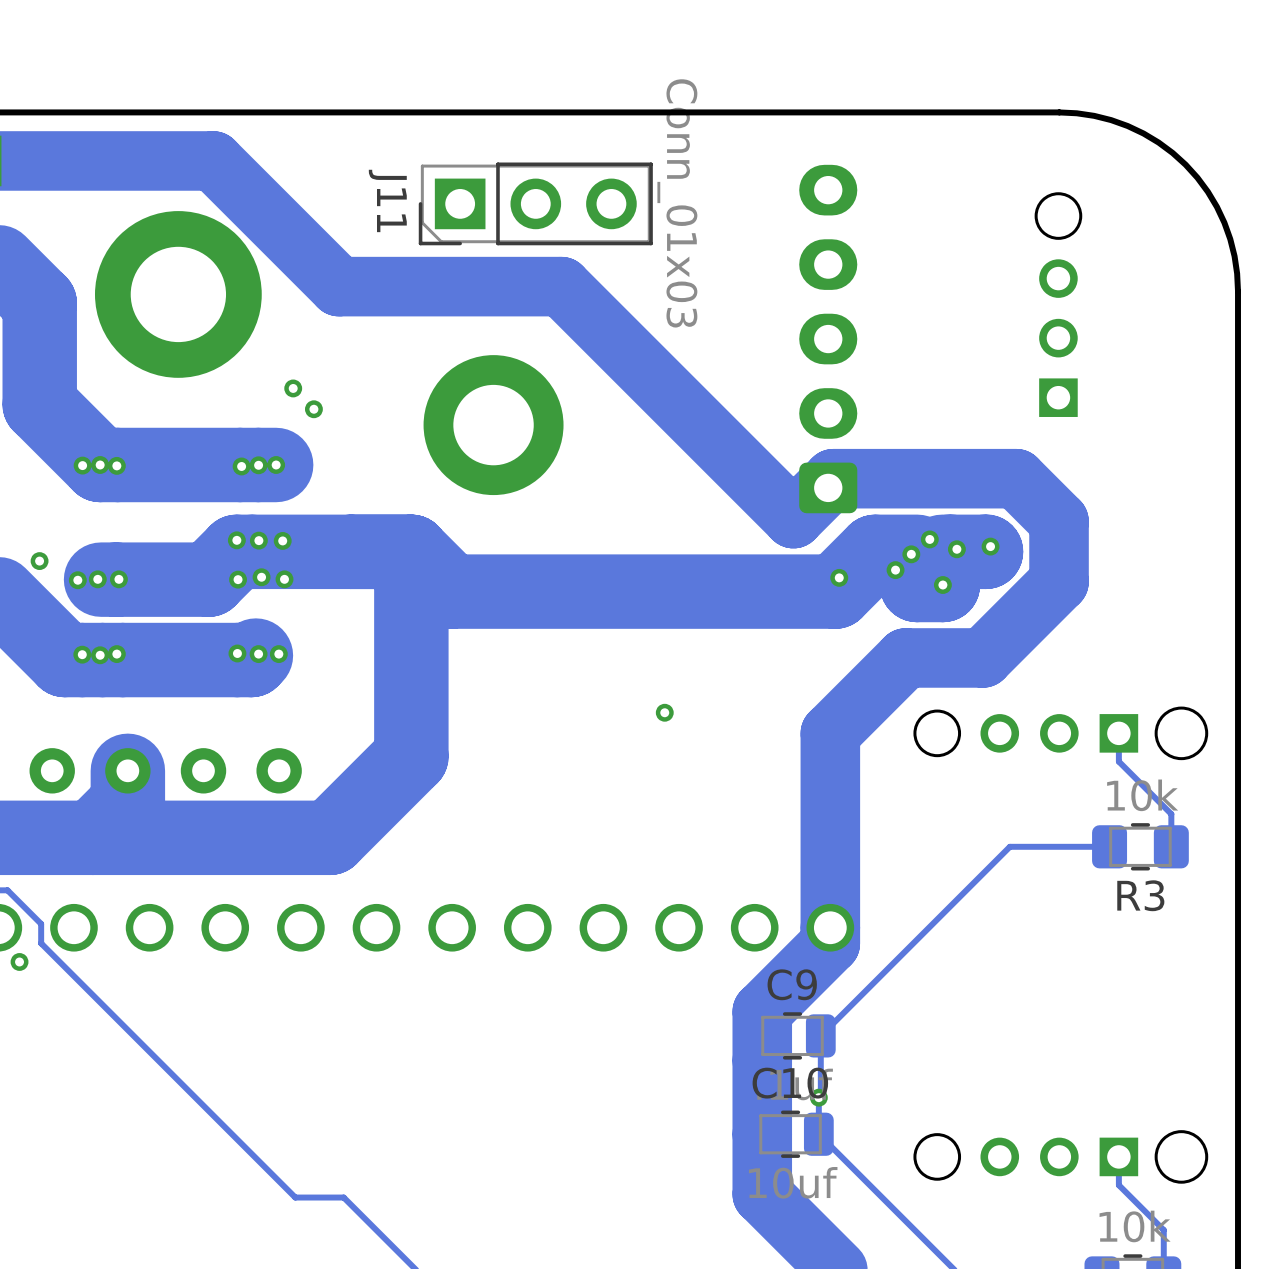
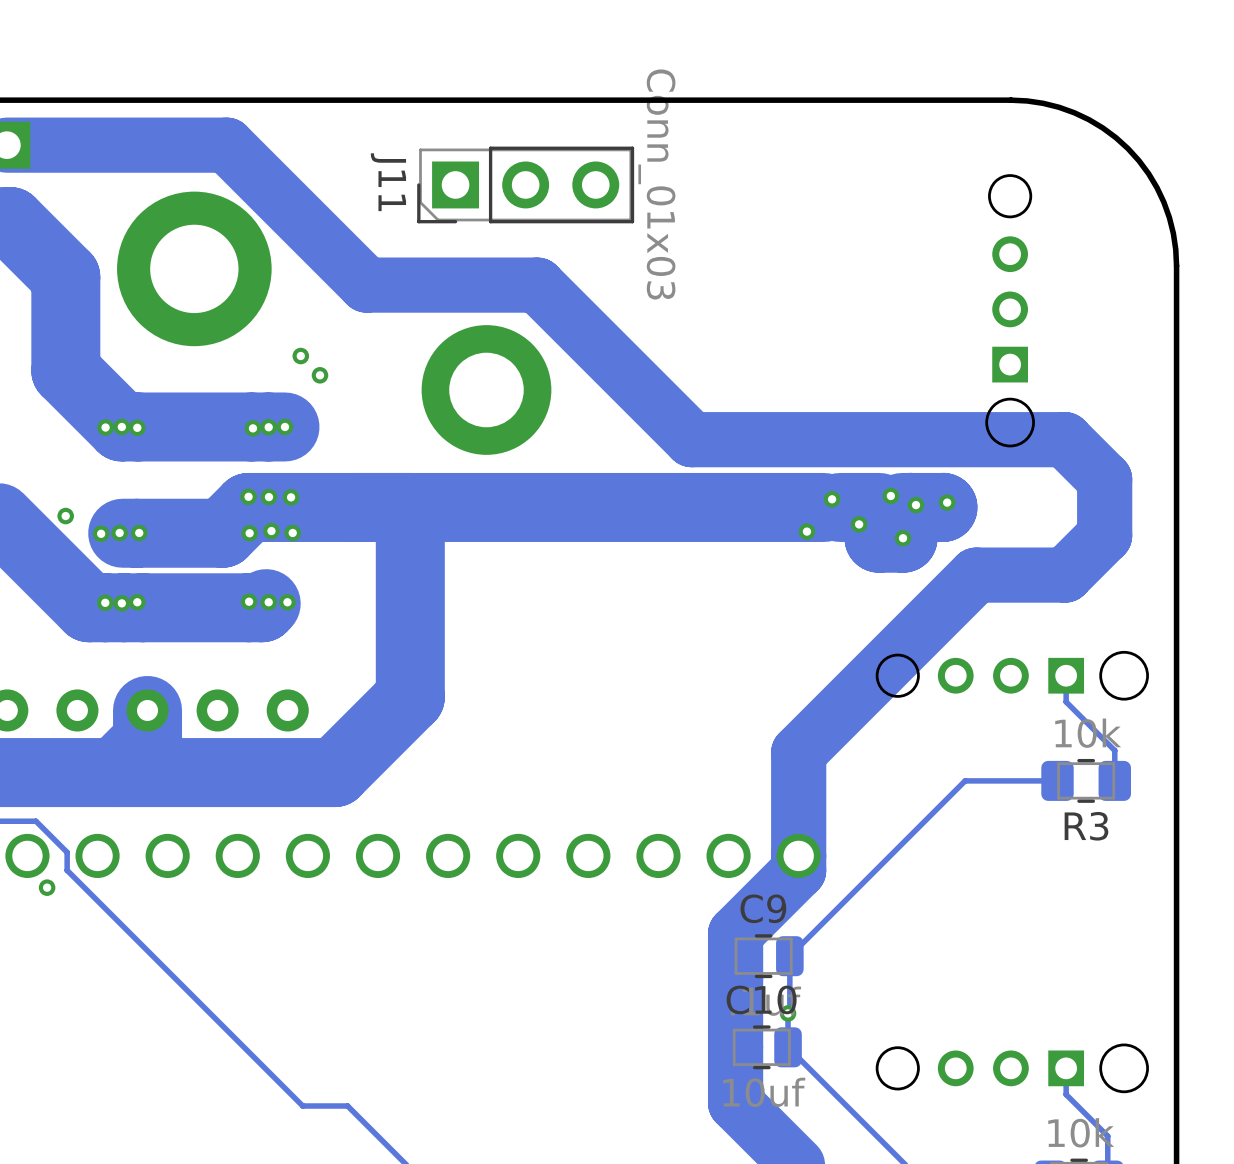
track: (338, 286) (561, 286) (793, 518) (833, 478) -> (343, 261) (366, 285) (537, 285) (691, 439) (801, 439)
part: (828, 339) -> none
part: none -> (1010, 310)
track: (1016, 478) (1059, 521) (1059, 581) (982, 657) (905, 657) (830, 733) (830, 816) -> (971, 439) (1064, 439) (1104, 479) (1104, 535) (1065, 575) (976, 575) (798, 752)
track: (875, 551) (835, 591) (451, 591) (411, 551) -> (823, 507) (410, 507)
via position: (911, 554) -> (832, 499)
via: (664, 712) -> none

